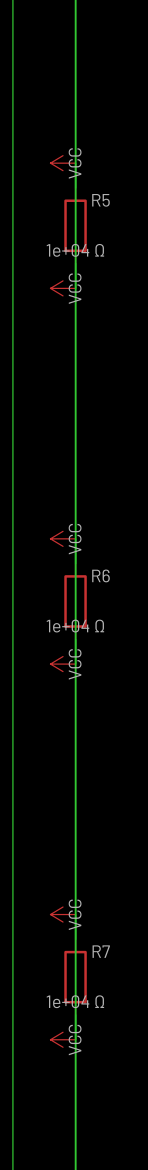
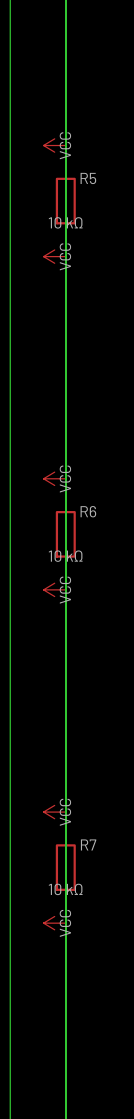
R5 value: 1e+04 Ω (75, 250) -> 10 kΩ (65, 222)
R6 value: 1e+04 Ω (75, 626) -> 10 kΩ (65, 556)
R7 value: 1e+04 Ω (75, 1001) -> 10 kΩ (65, 889)

